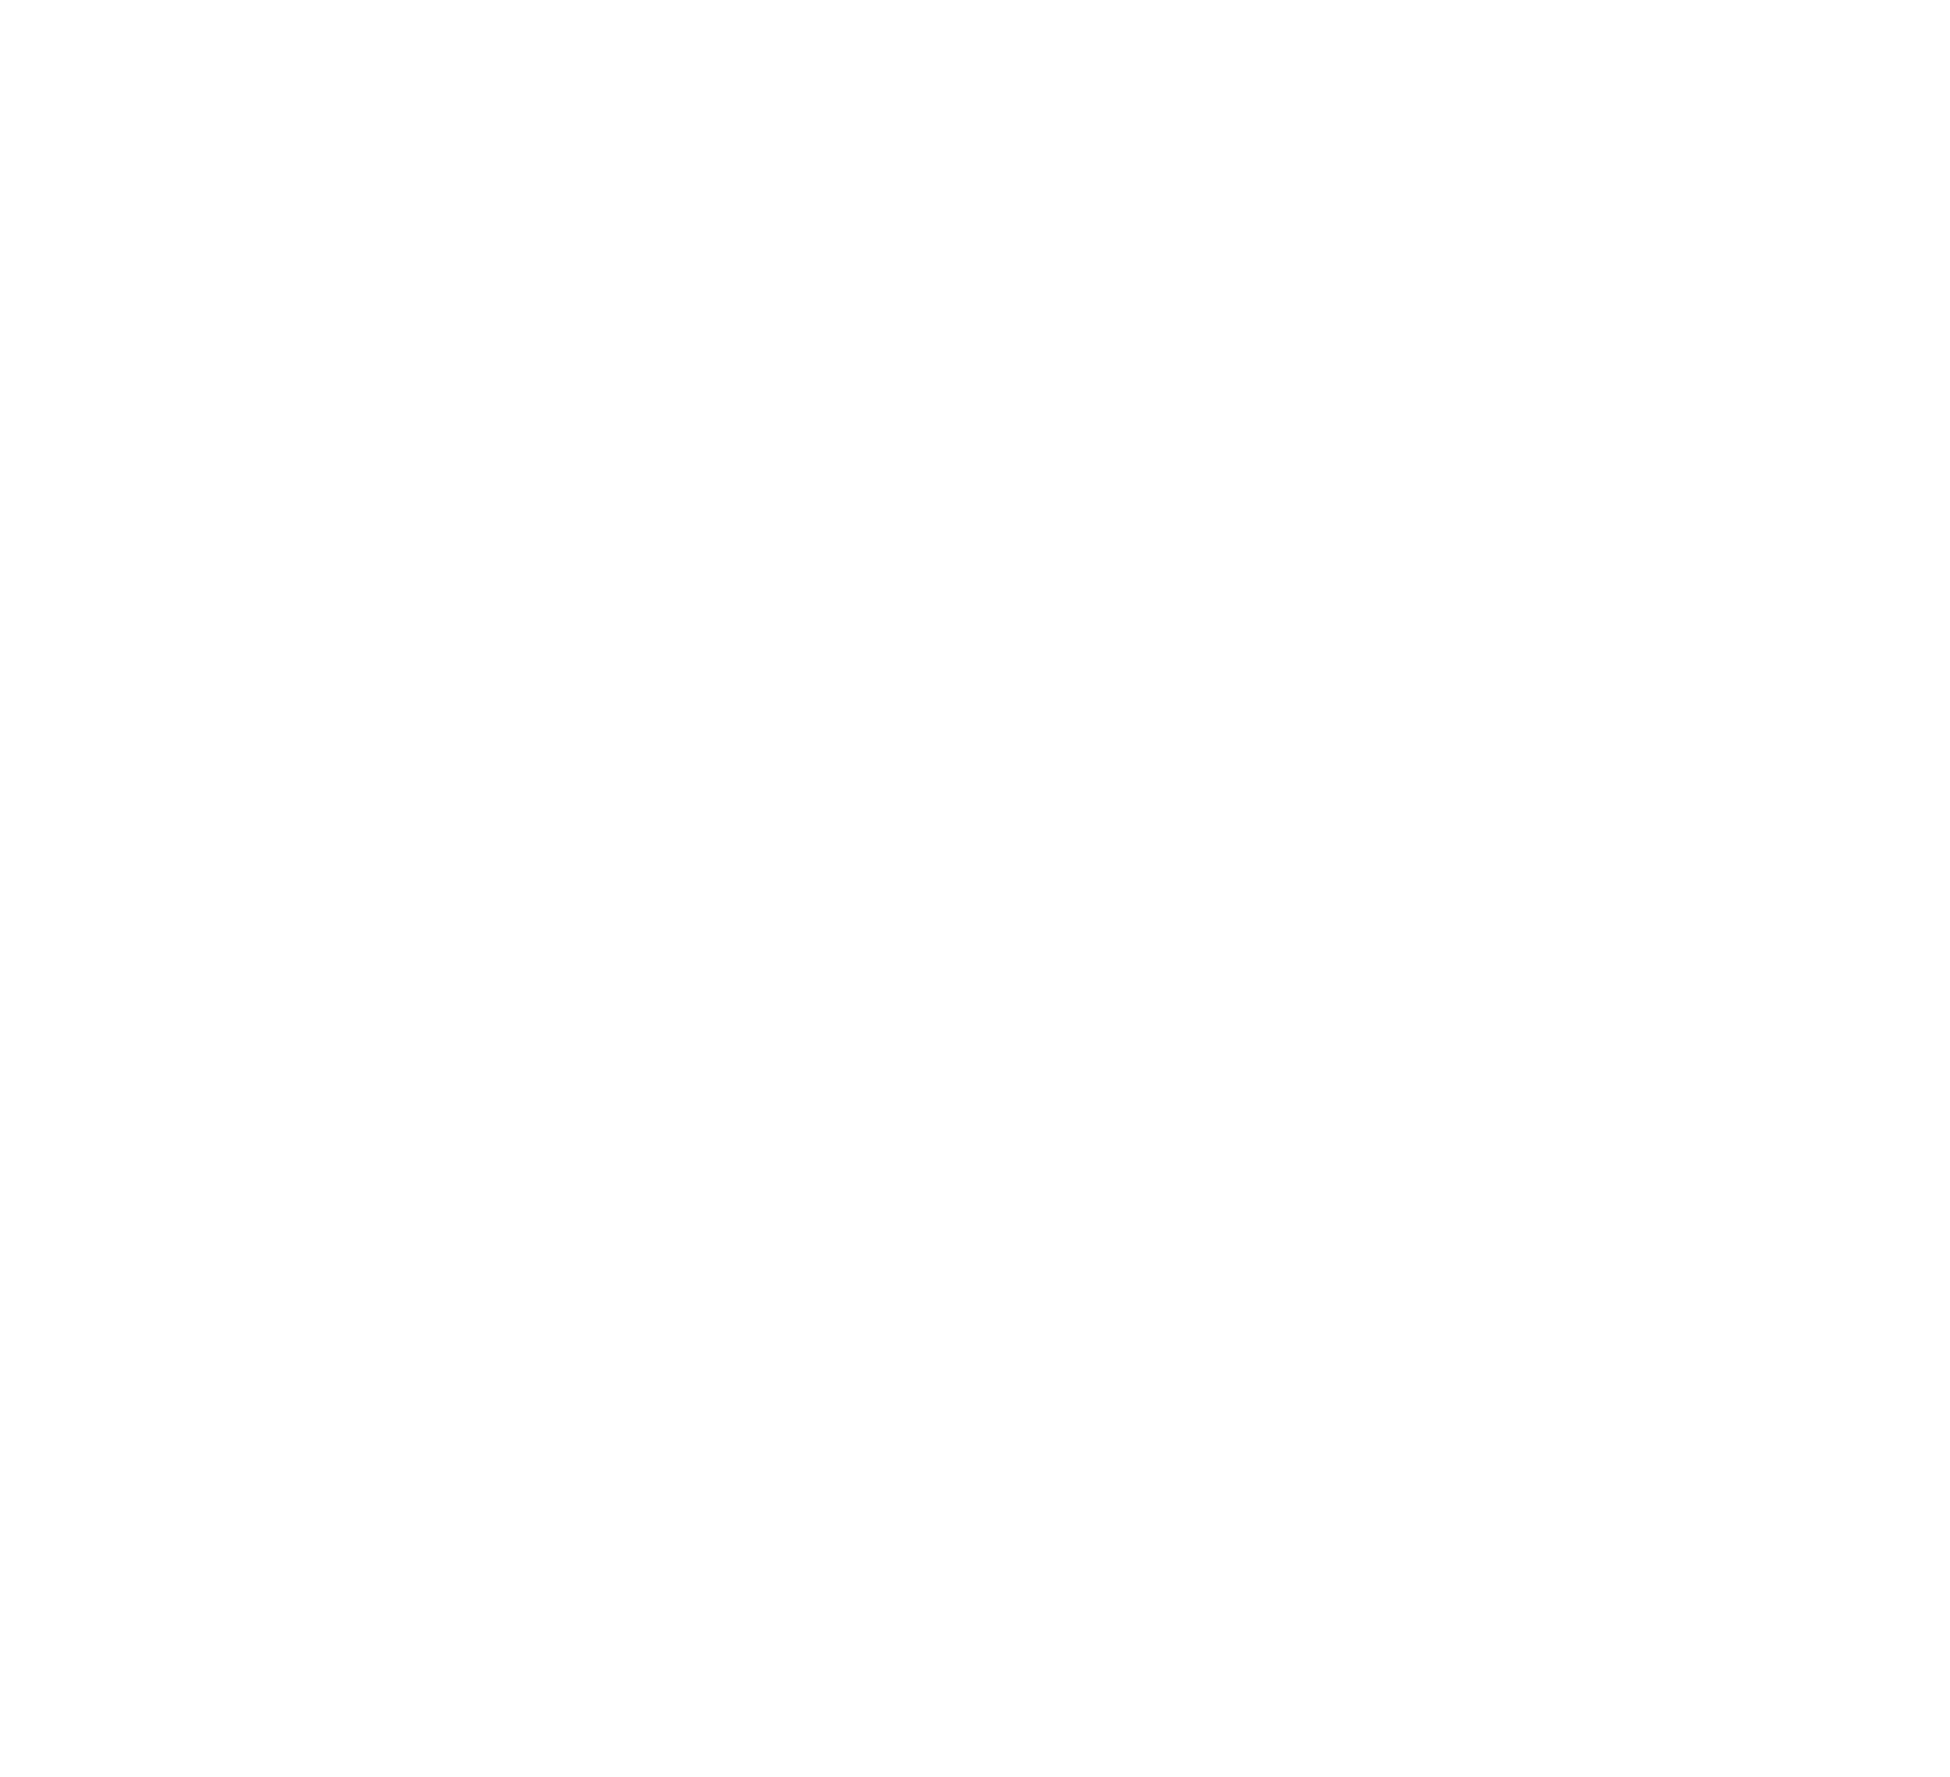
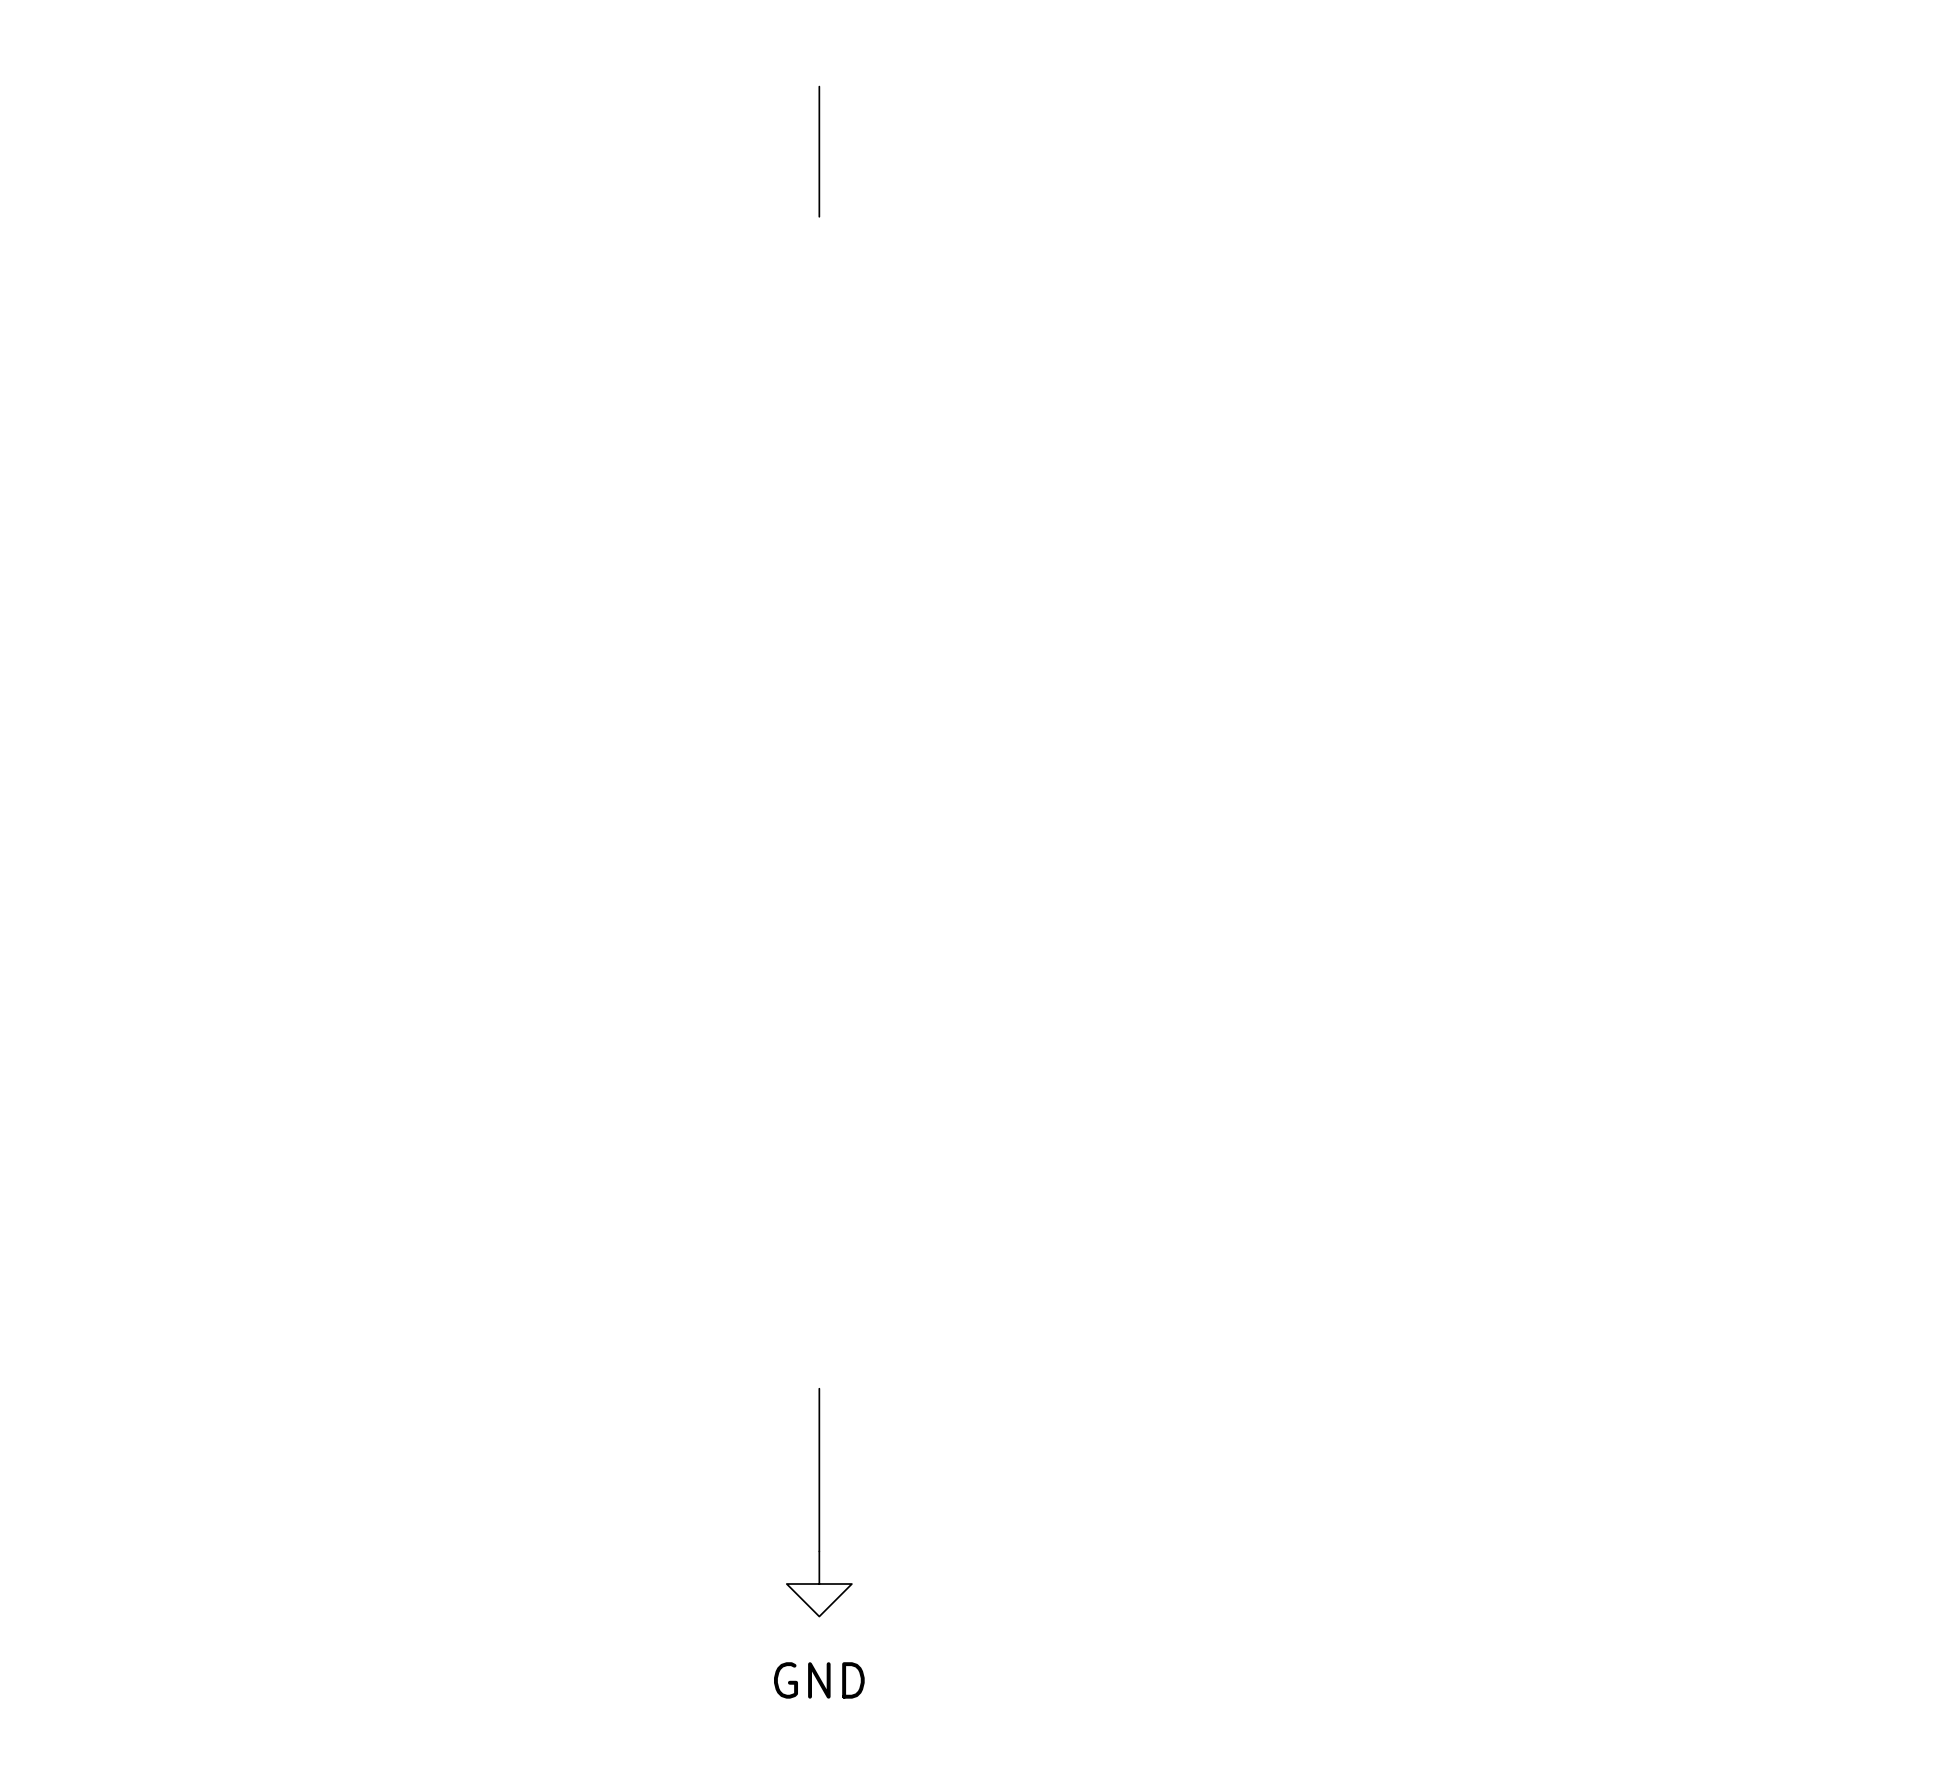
wire: none -> (819, 86) (819, 216)
wire: none -> (819, 1388) (819, 1551)
power symbol: none -> GND (819, 1584)

